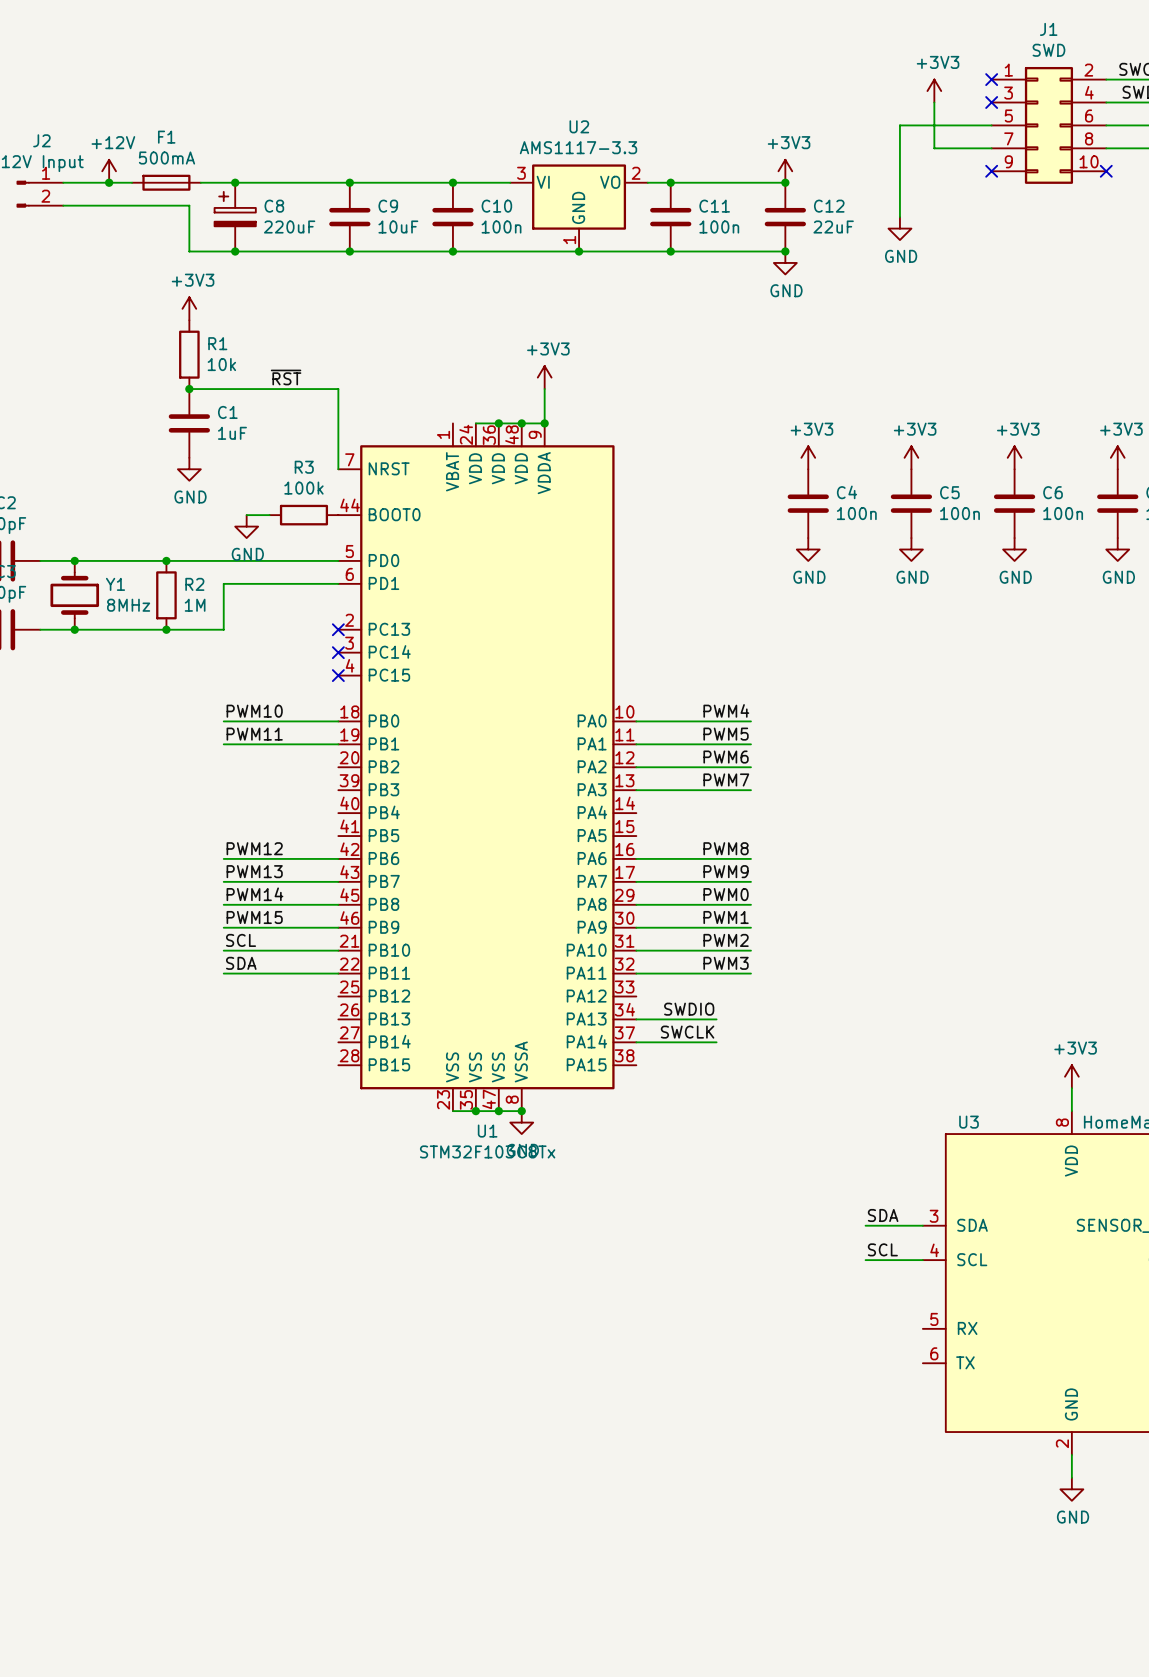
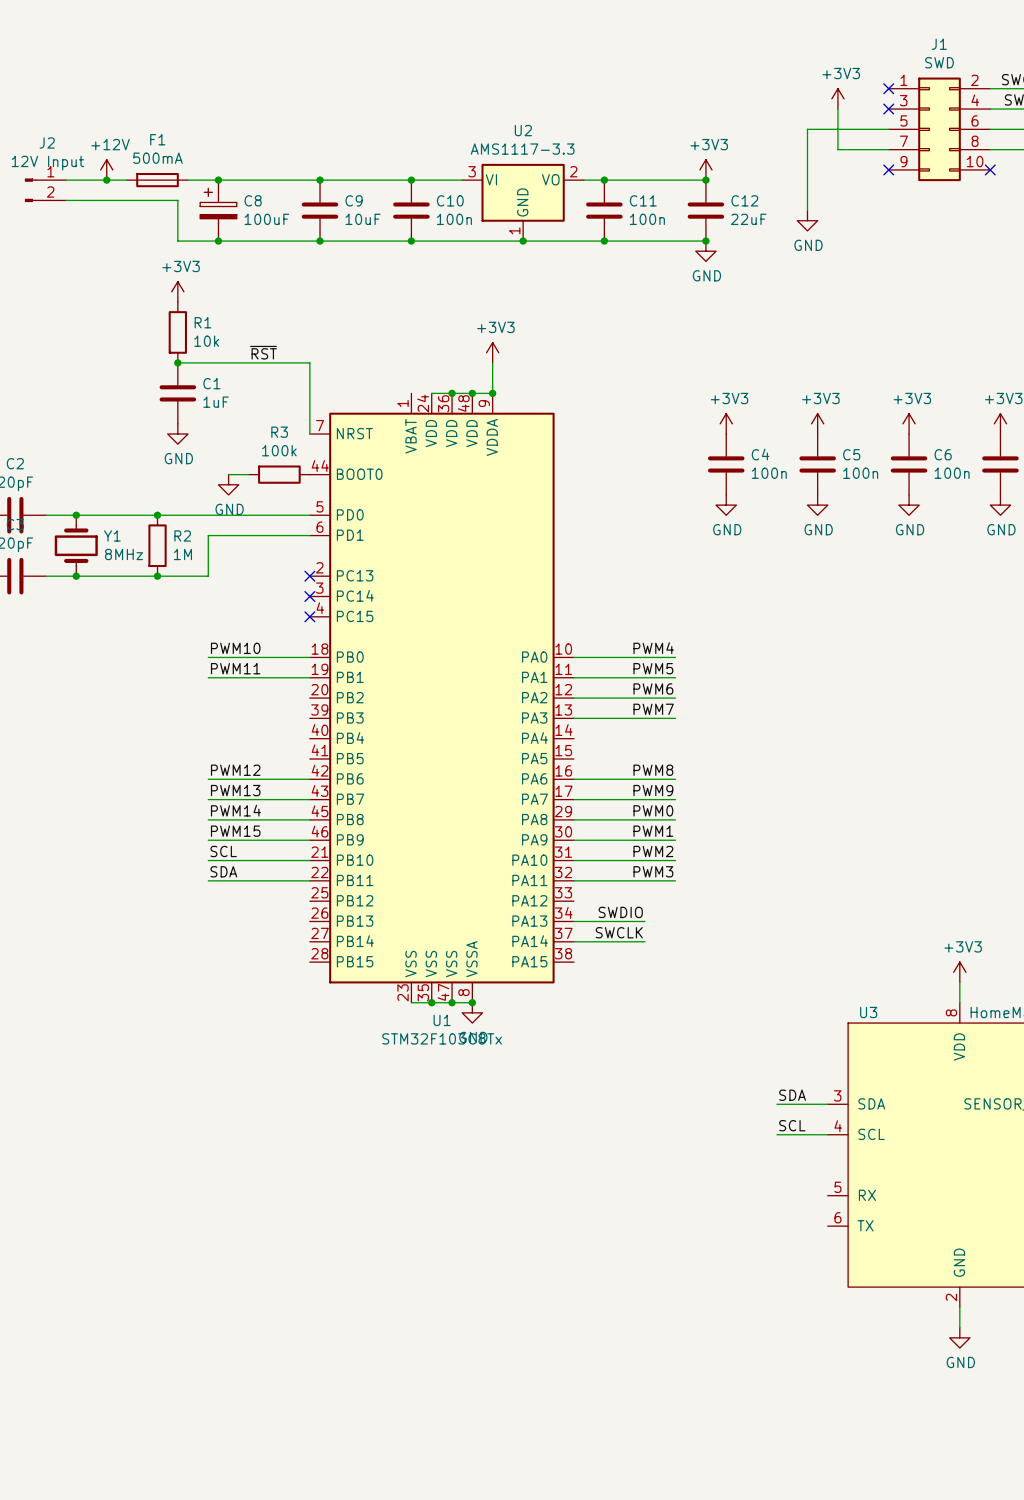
C8 value: 220uF (289, 227) -> 100uF (266, 219)

